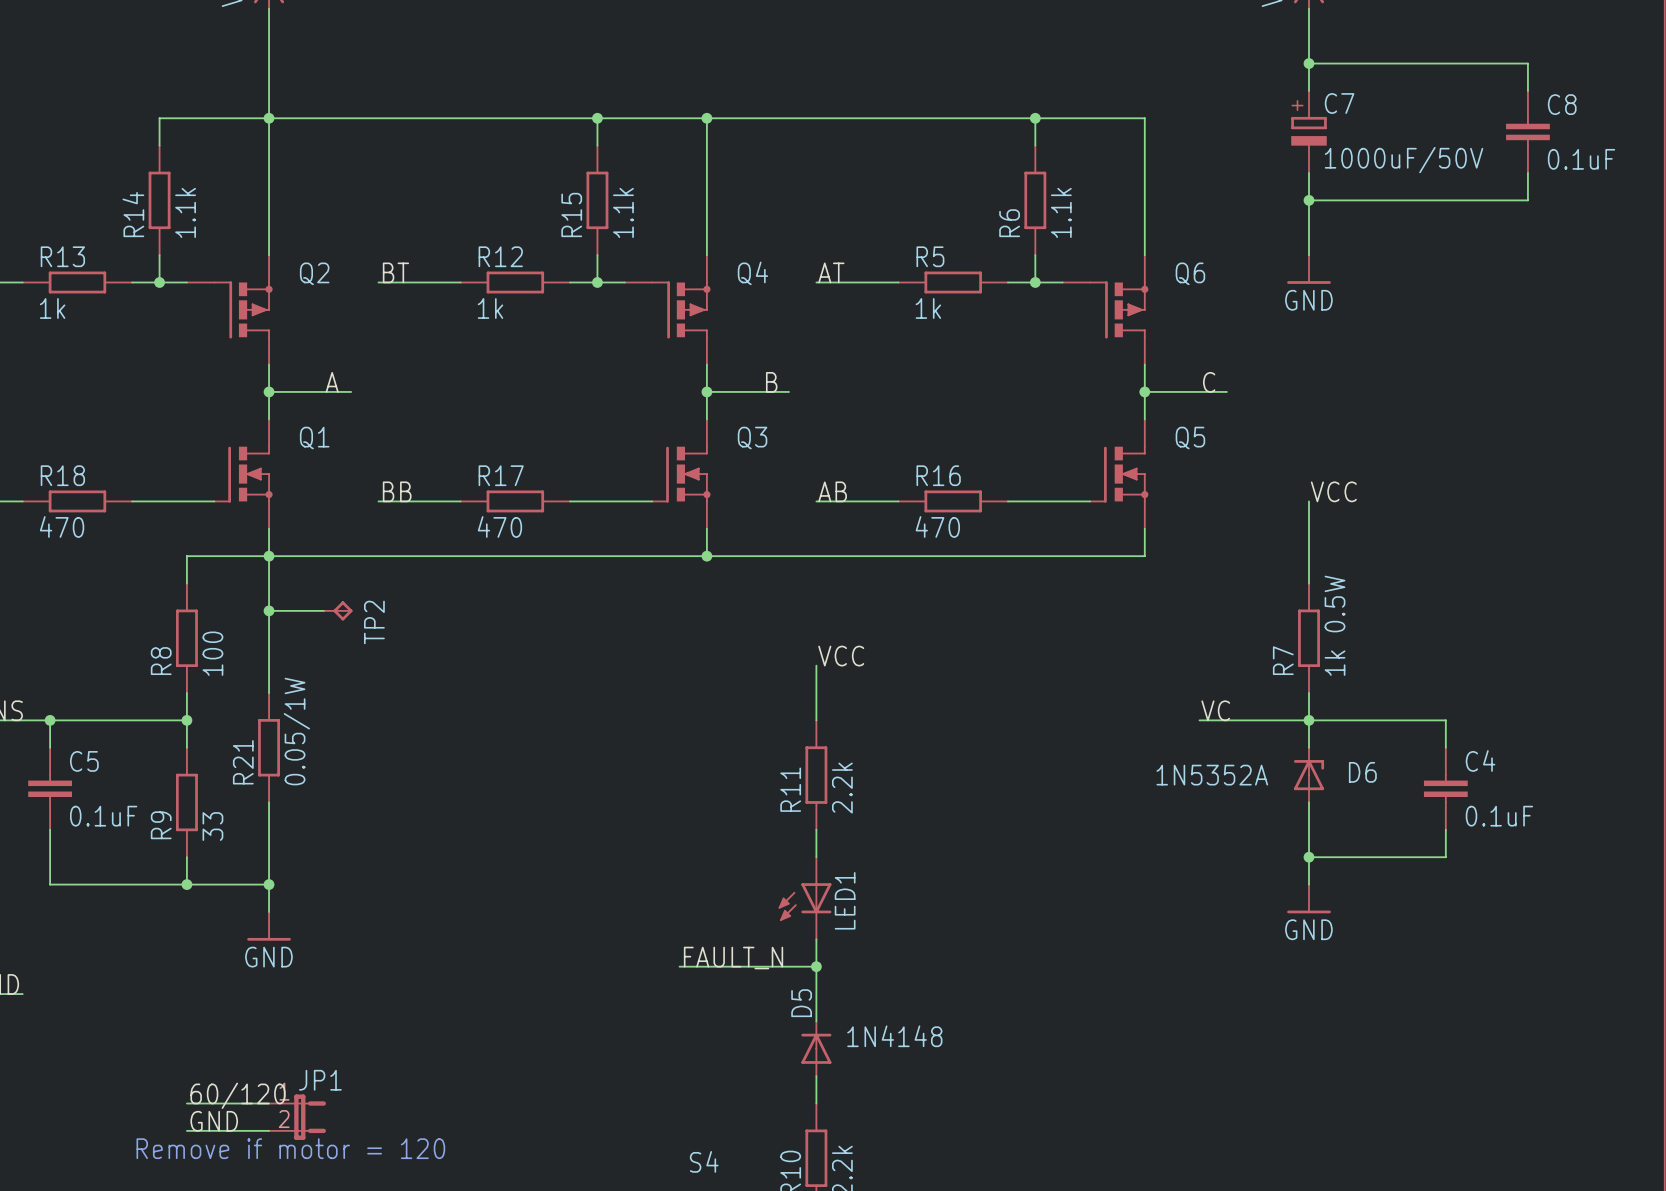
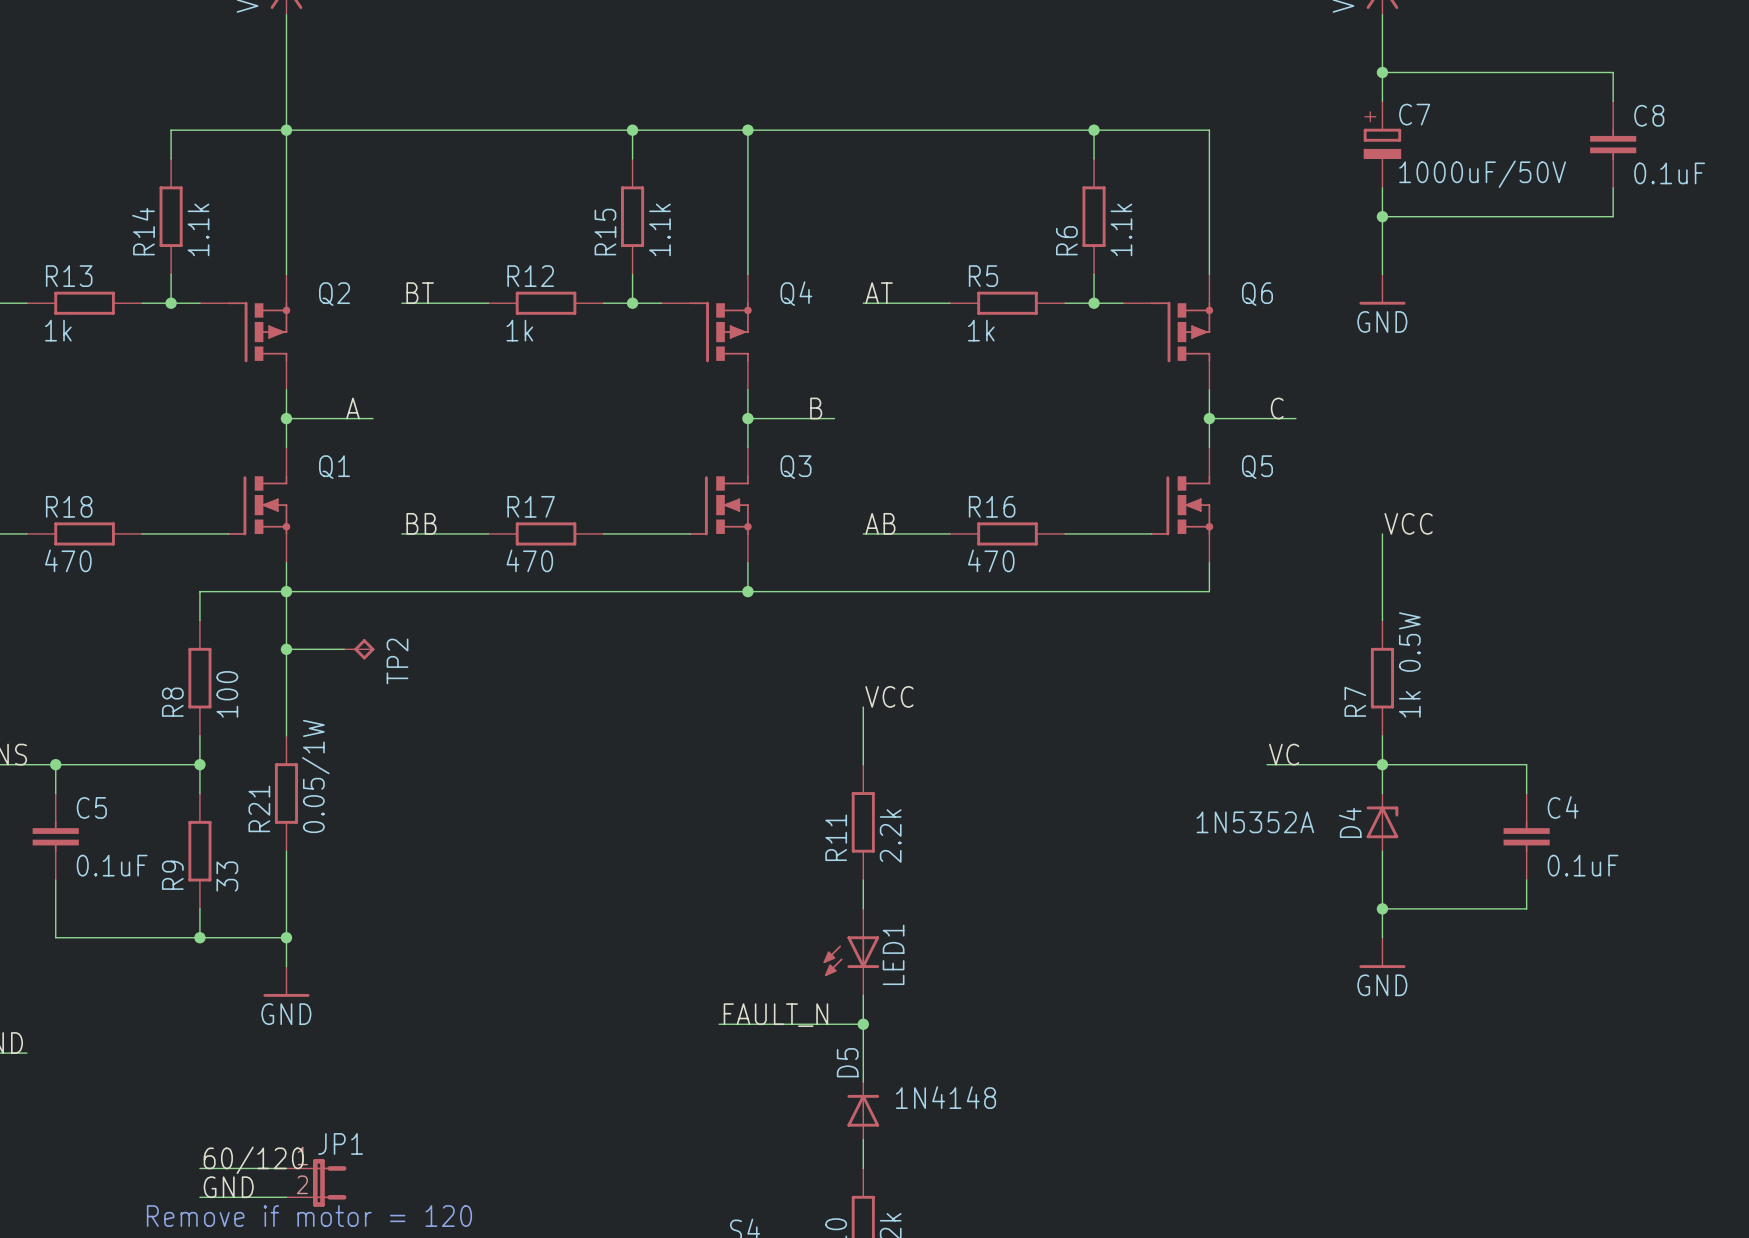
D6 name: D6 (1362, 772) -> D4 (1350, 822)
D6 value position: 1N5352A (1212, 775) -> 1N5352A (1255, 822)

